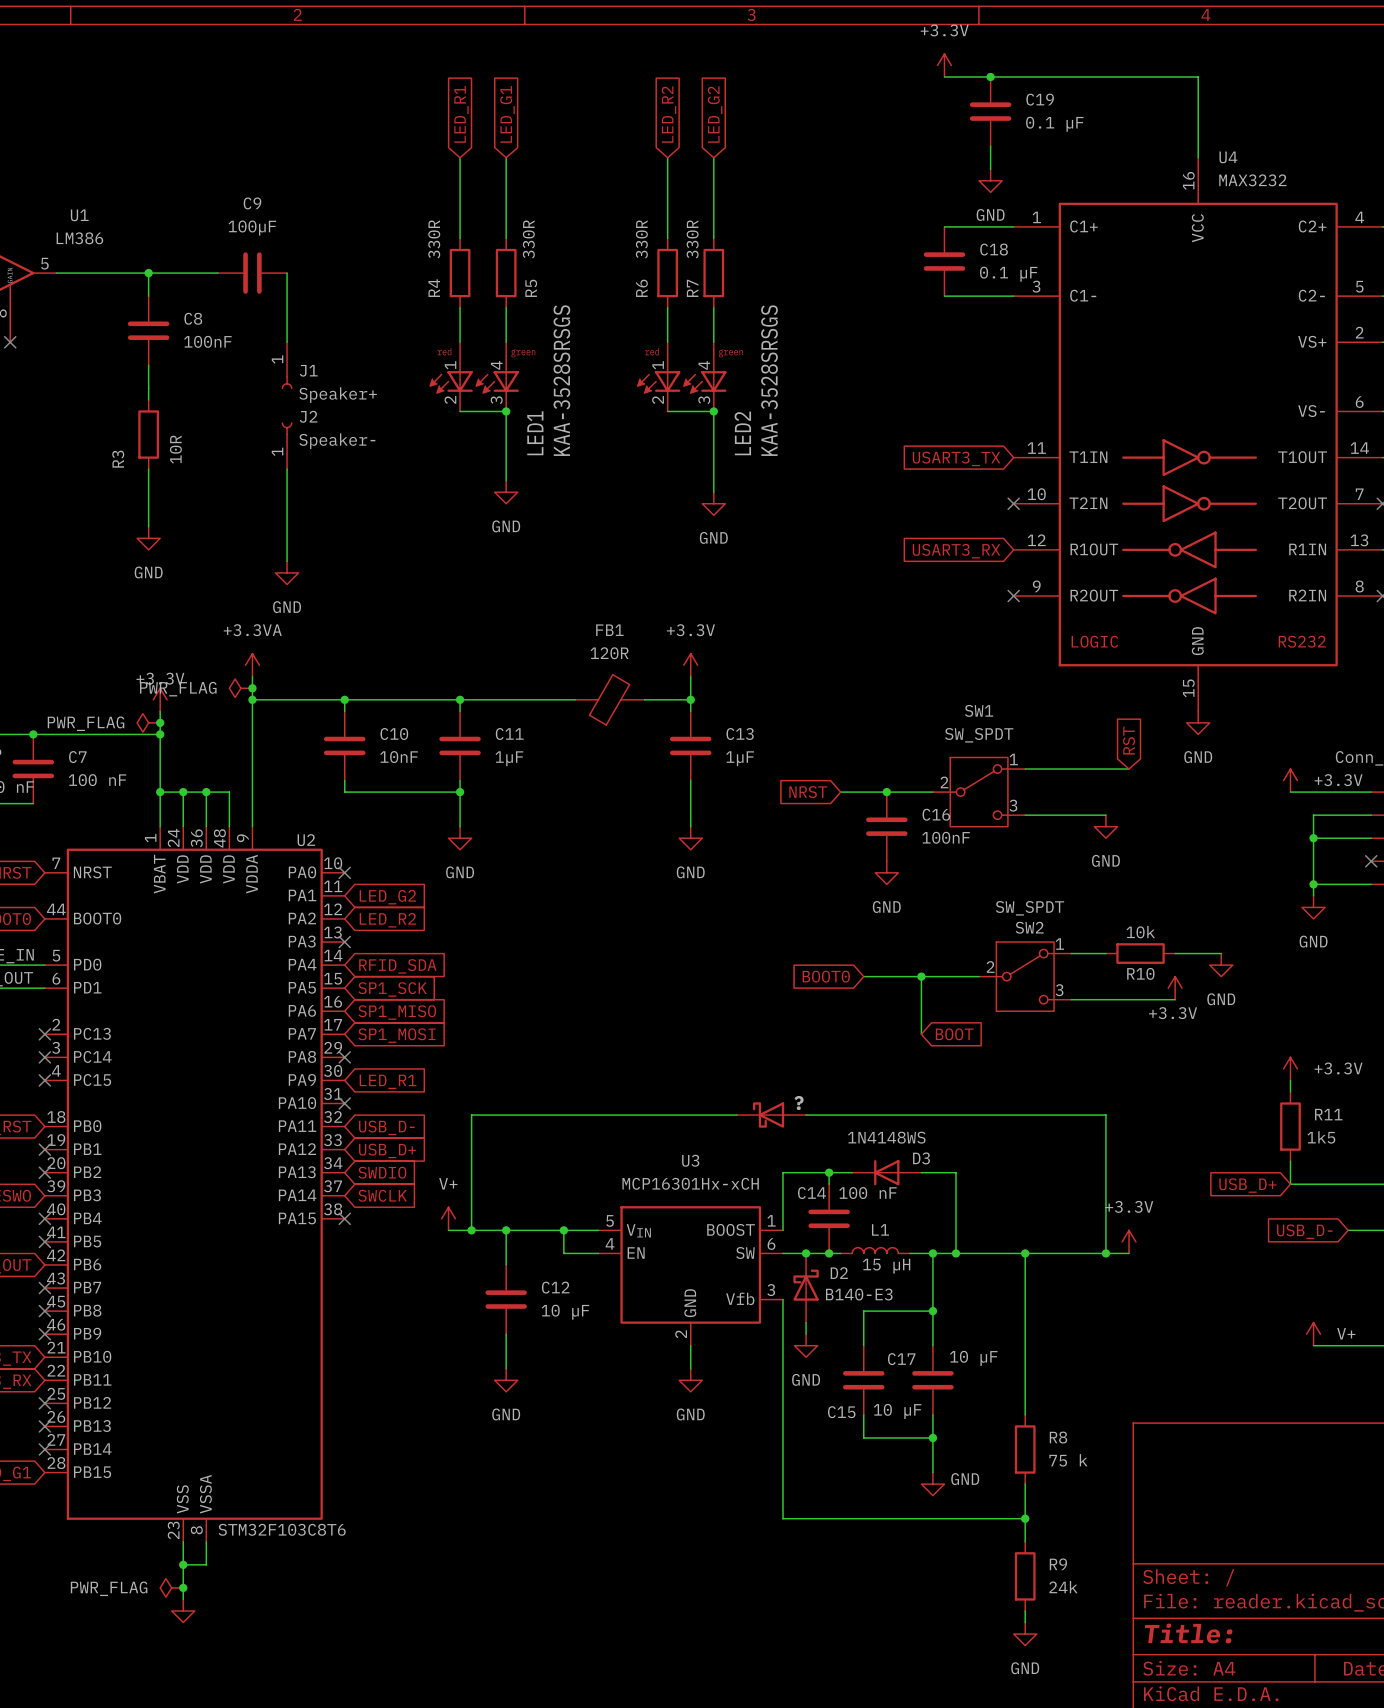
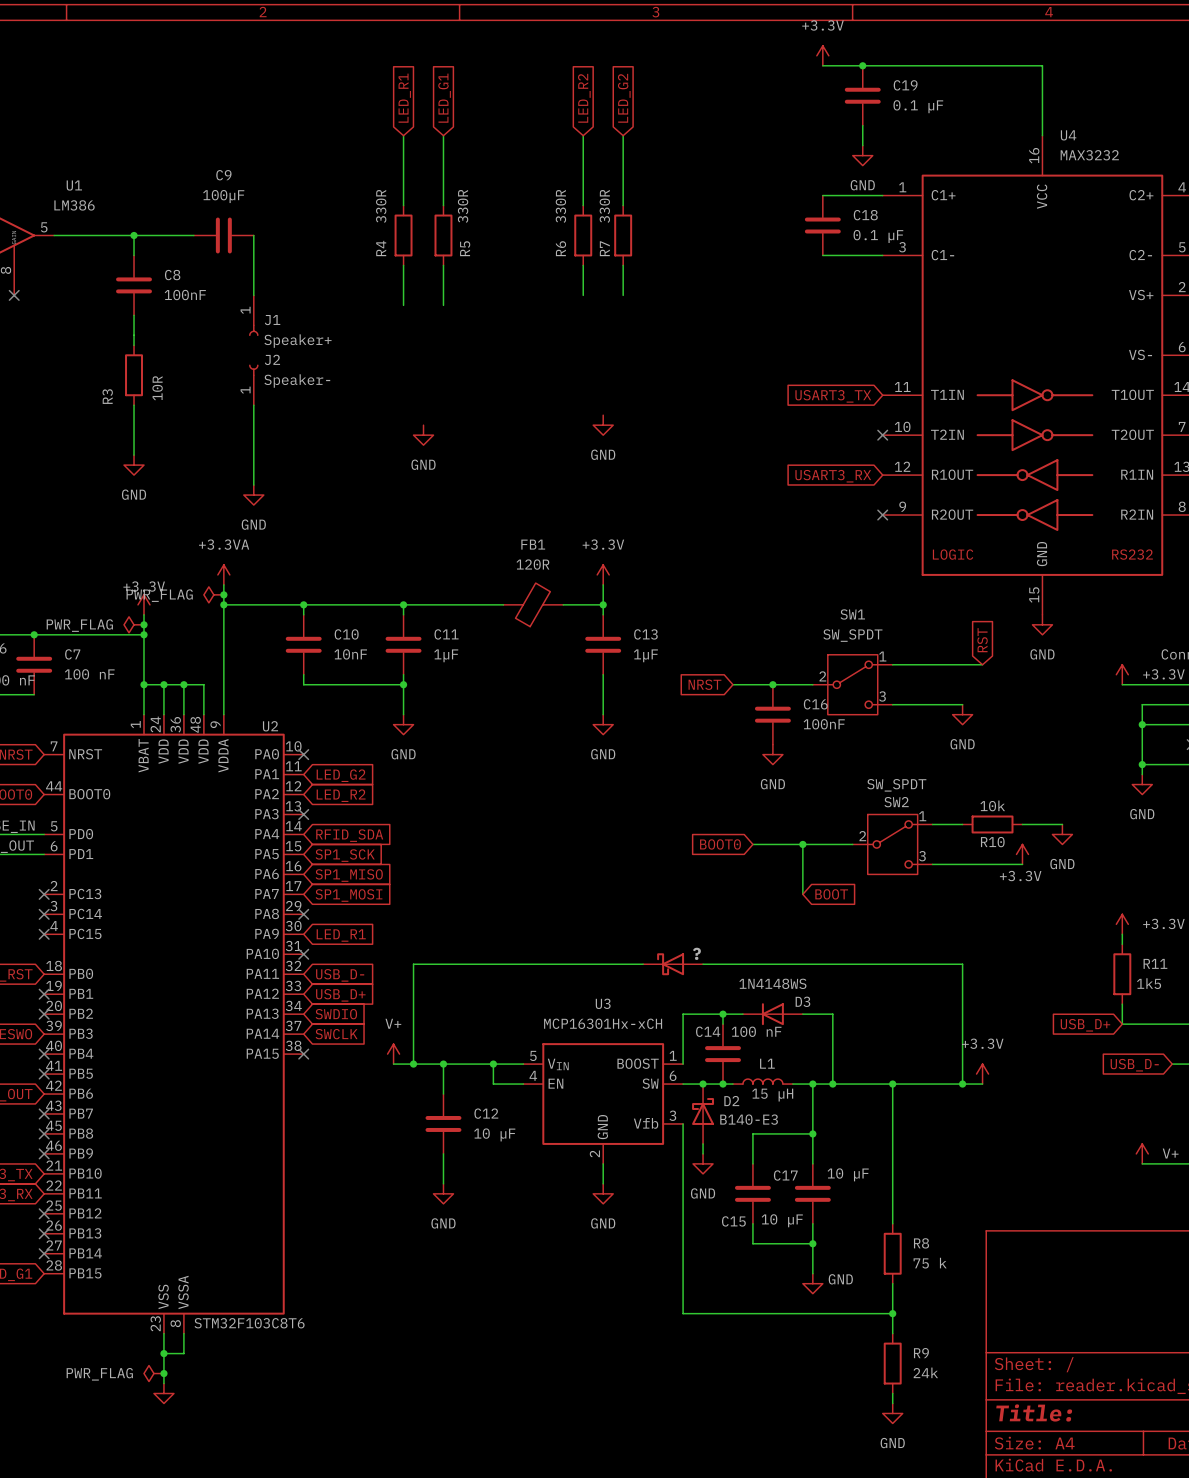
LED1: KAA-3528SRSGS (474, 376) -> none
LED2: KAA-3528SRSGS (681, 376) -> none
wire: (460, 411) (506, 411) (506, 480) -> none
junction: (506, 411) -> none
wire: (667, 411) (713, 411) (713, 492) -> none
junction: (713, 411) -> none
power symbol position: GND (506, 492) -> GND (423, 435)
power symbol position: GND (713, 503) -> GND (603, 425)

